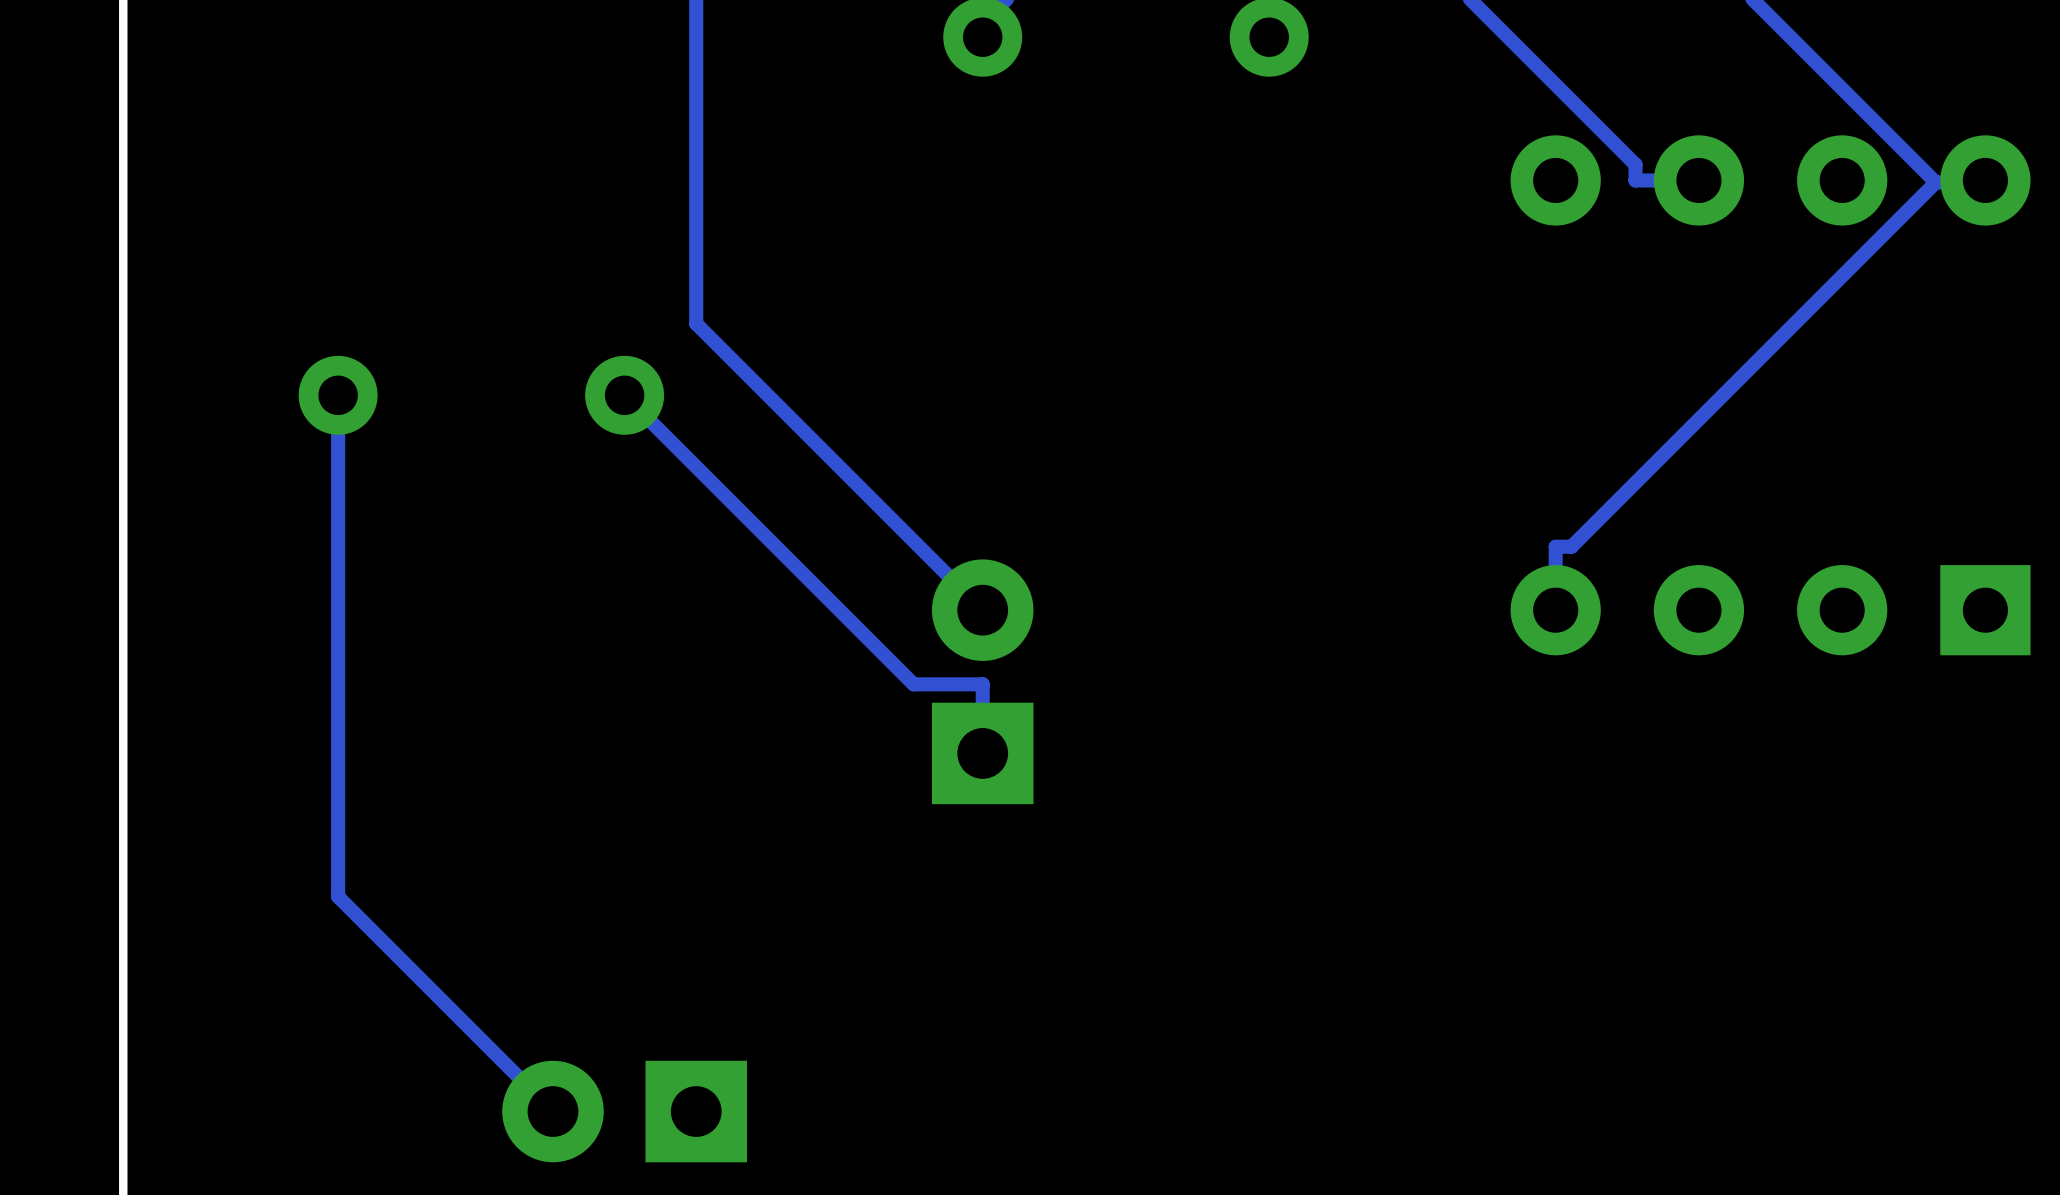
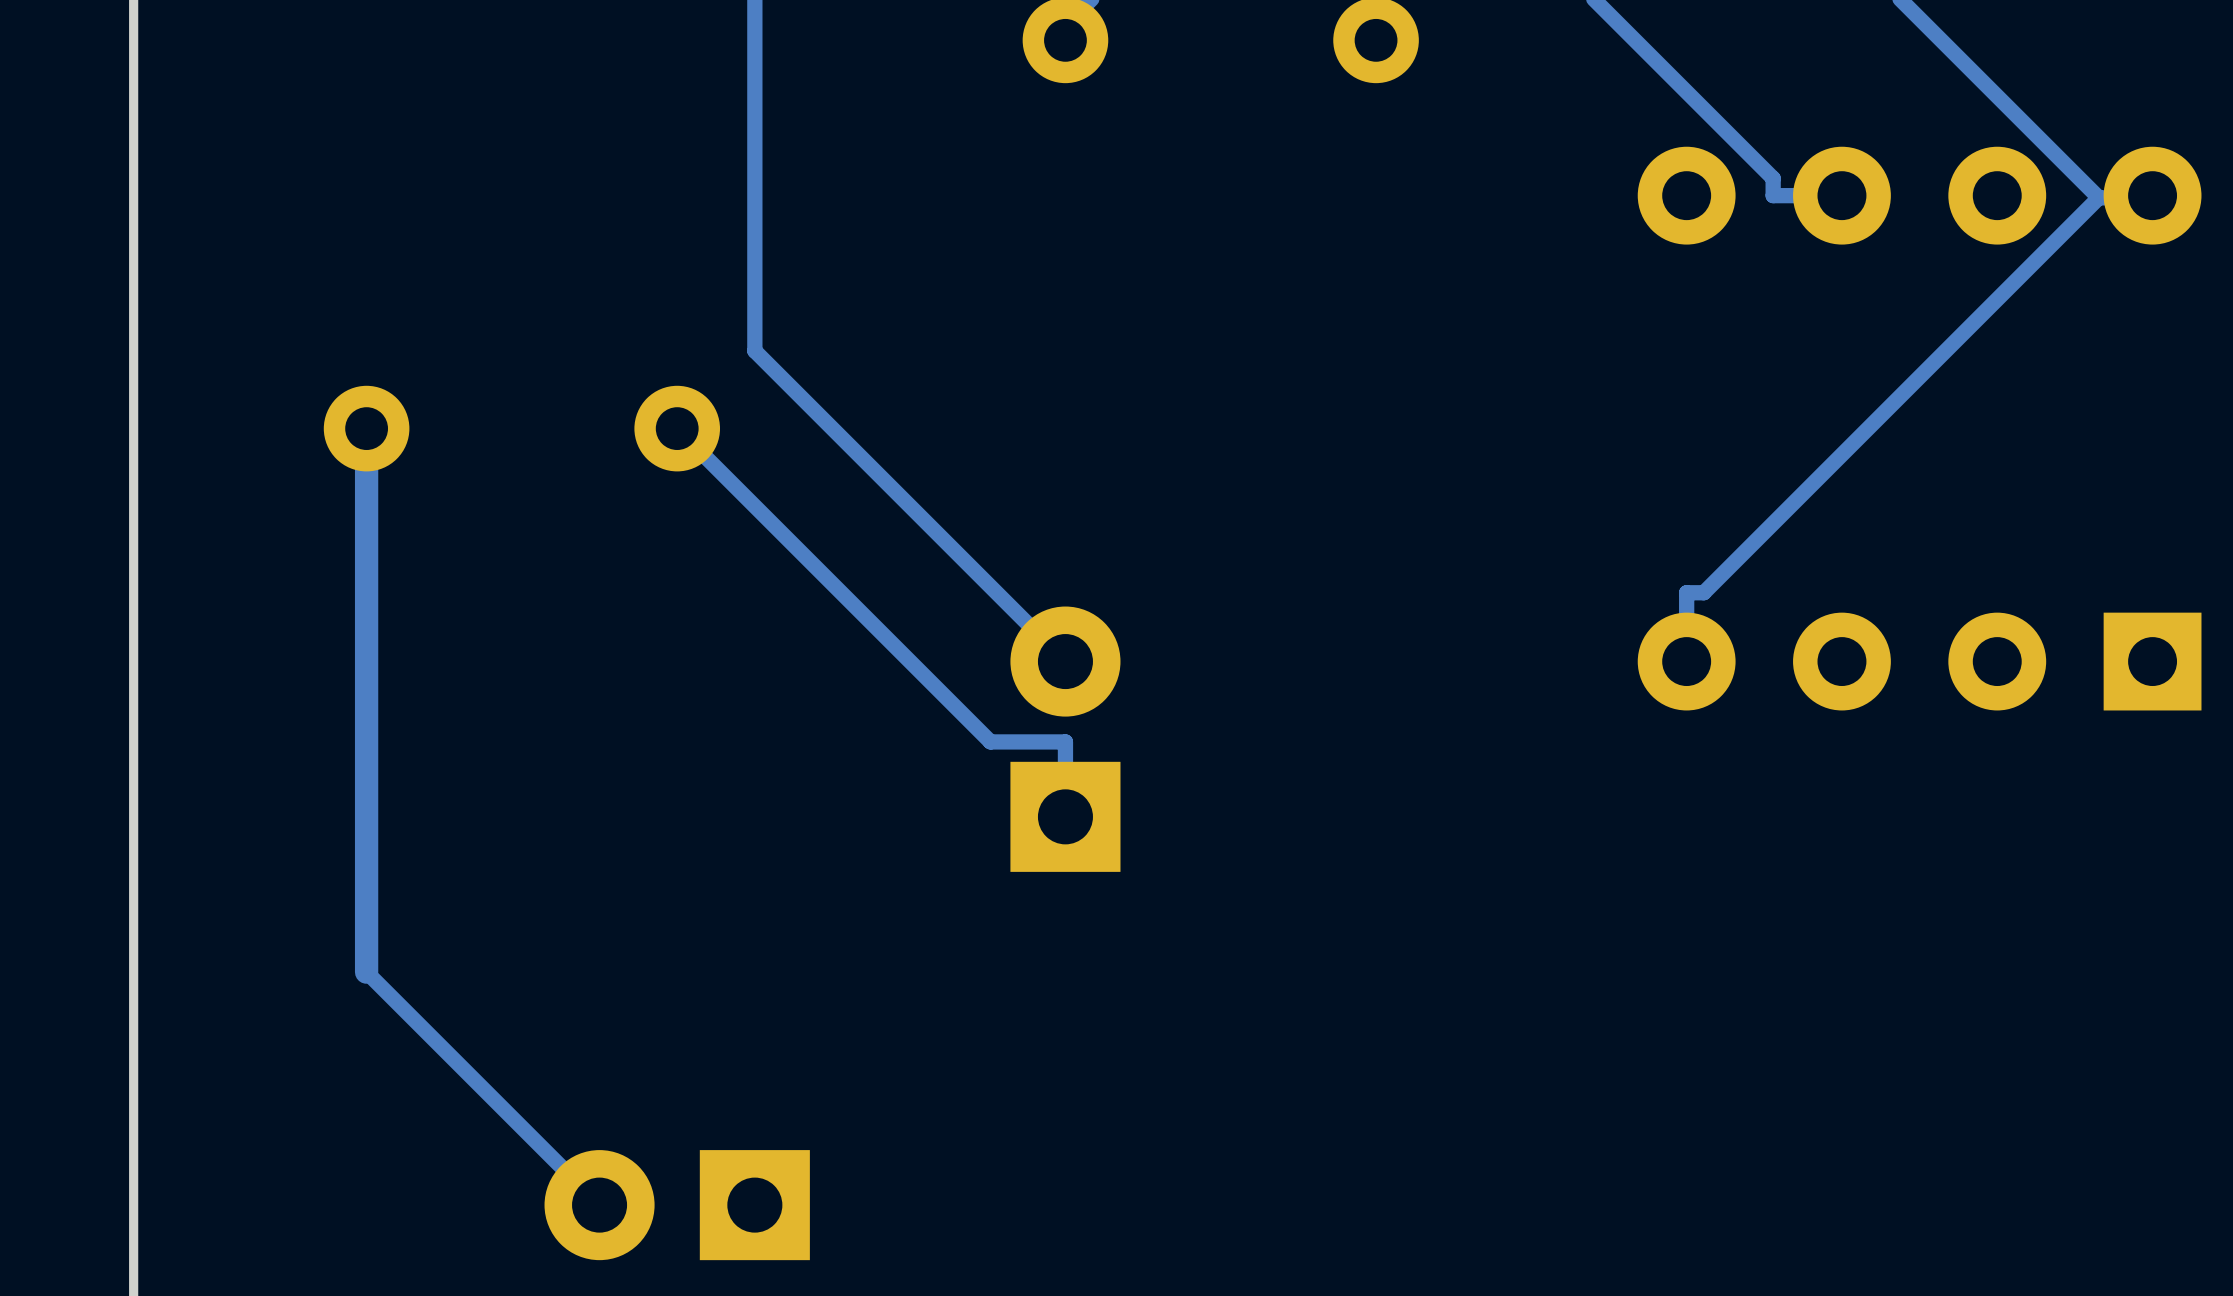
track width: thin (338, 395) (338, 896) -> thick (366, 428) (366, 972)

